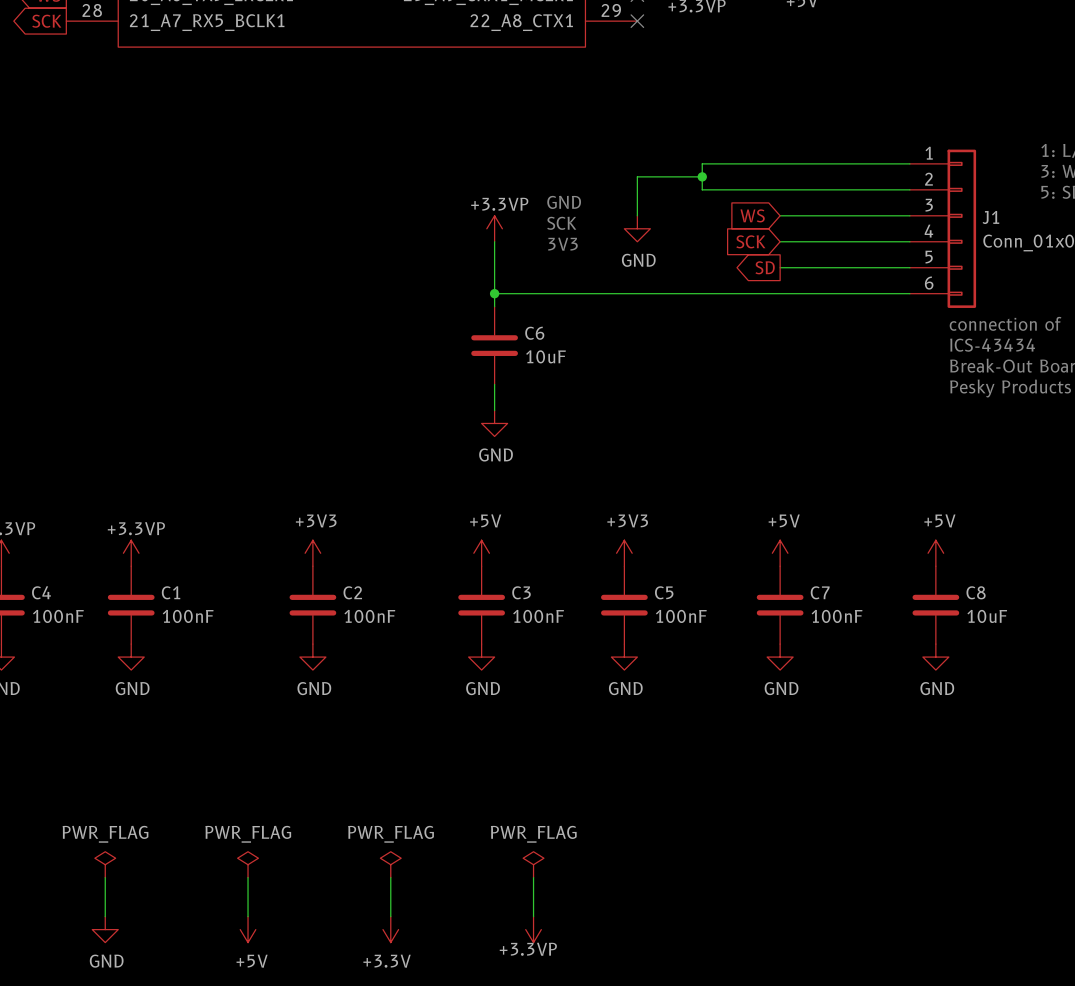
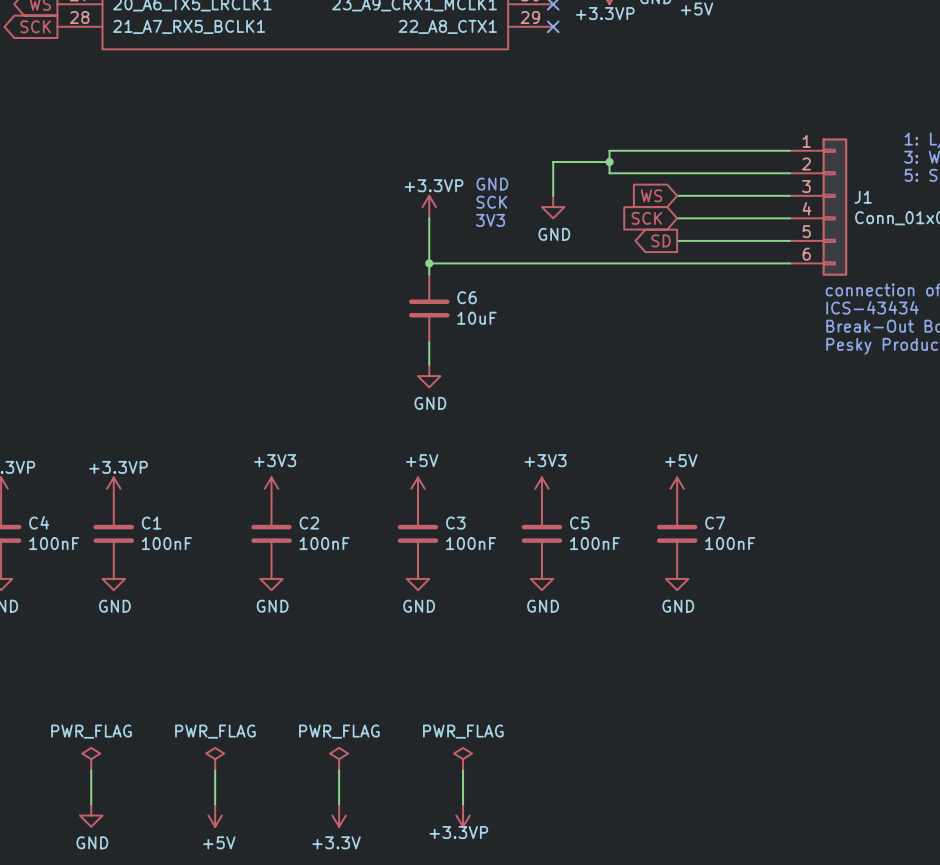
power symbol: +5V (935, 553) -> none
C8: 10uF (935, 605) -> none
power symbol: GND (935, 657) -> none

